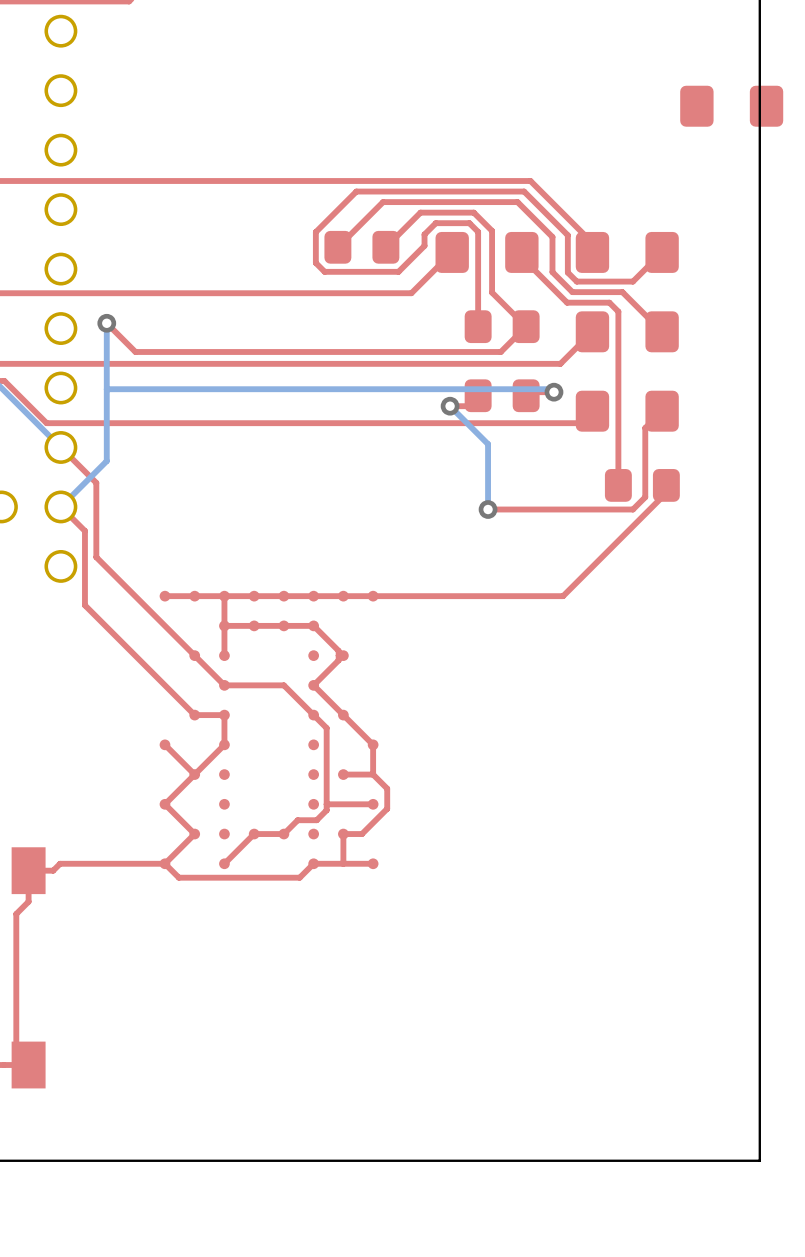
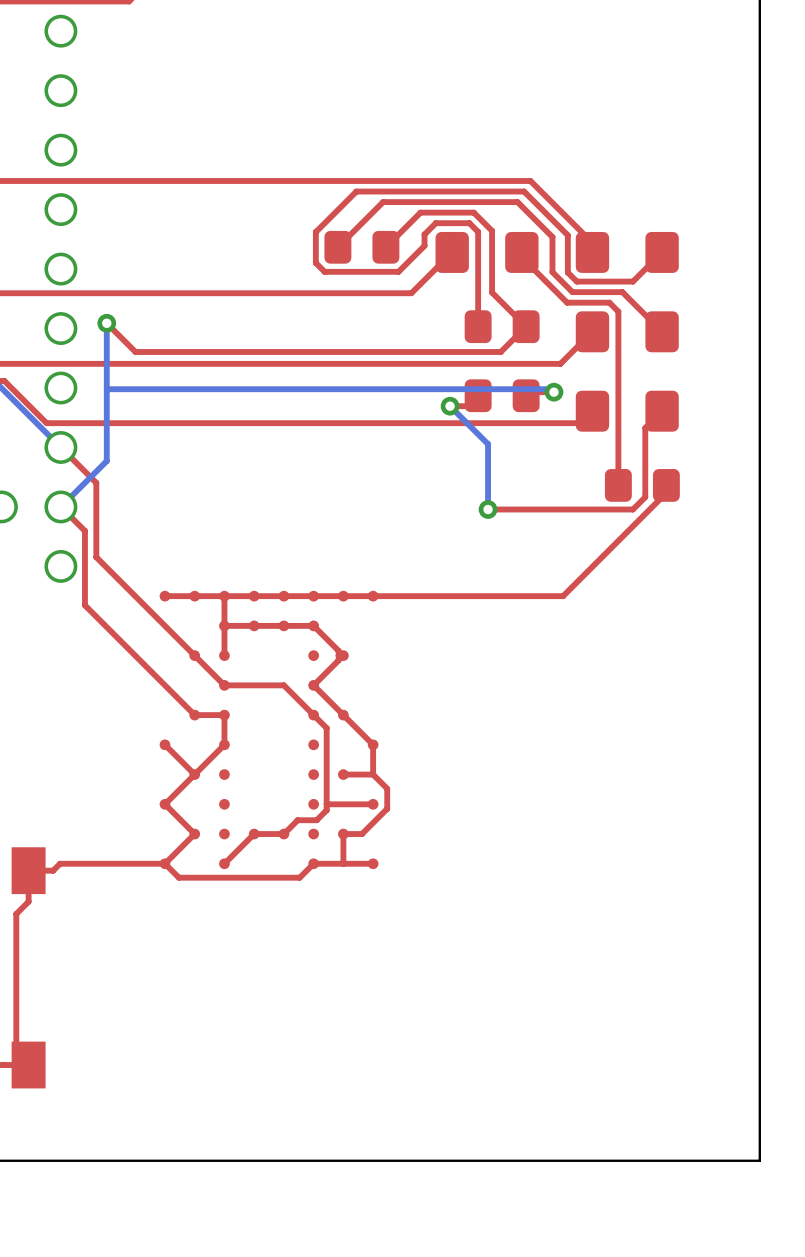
part: (731, 106) -> none

